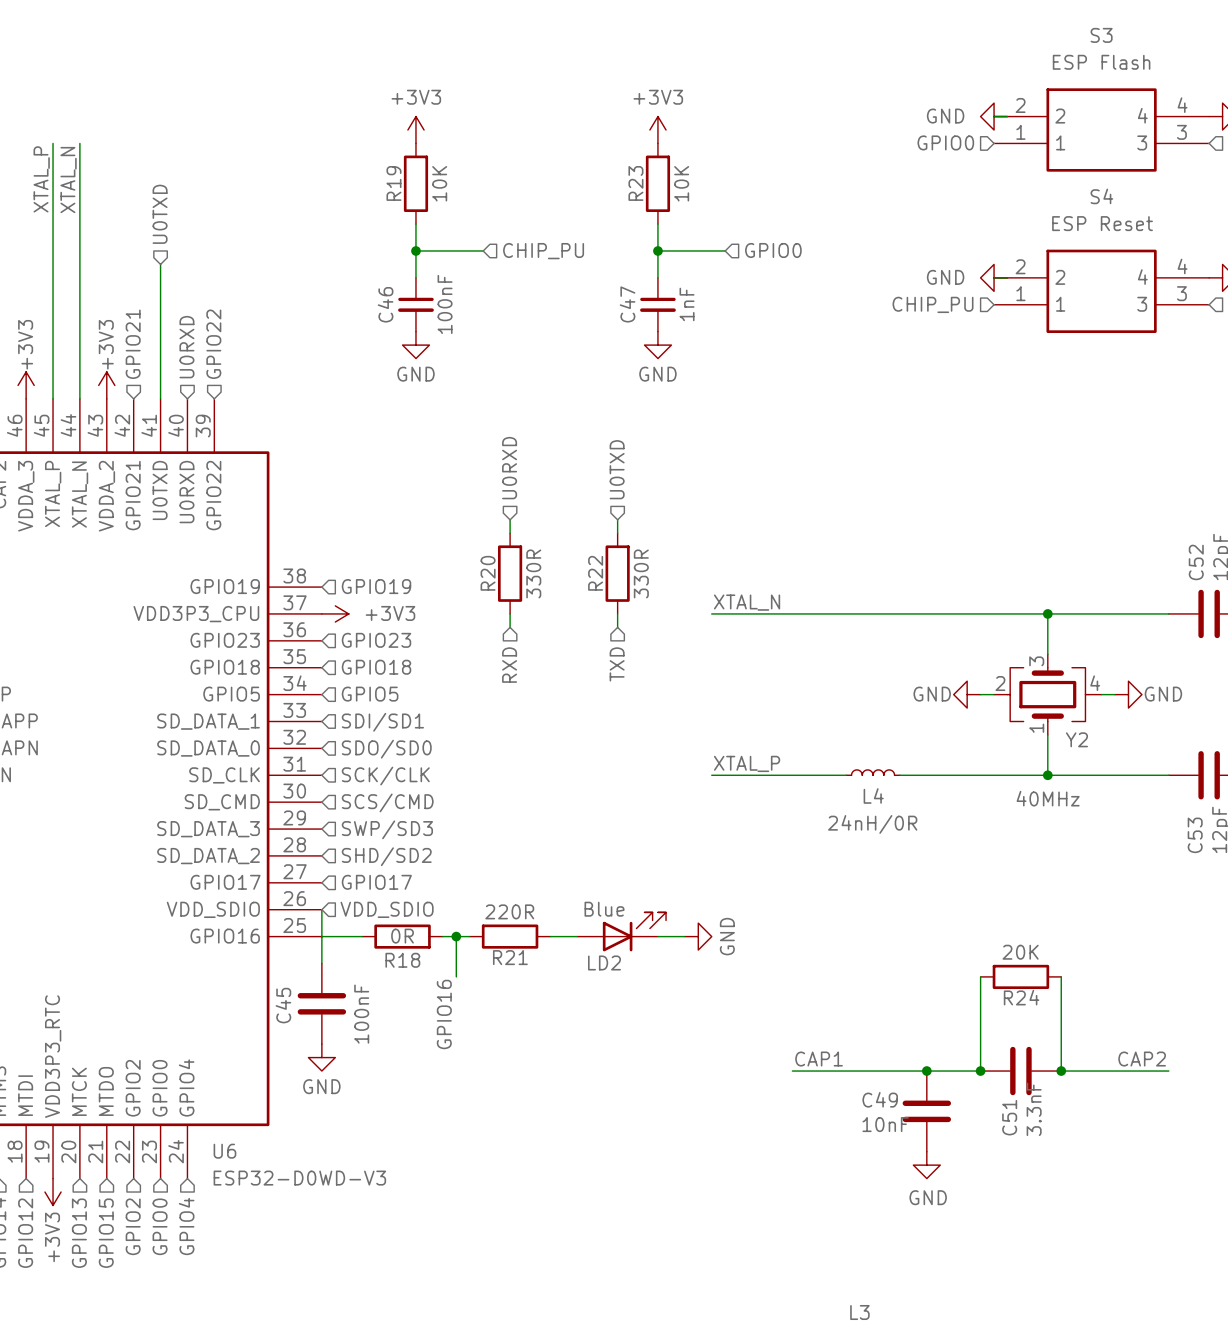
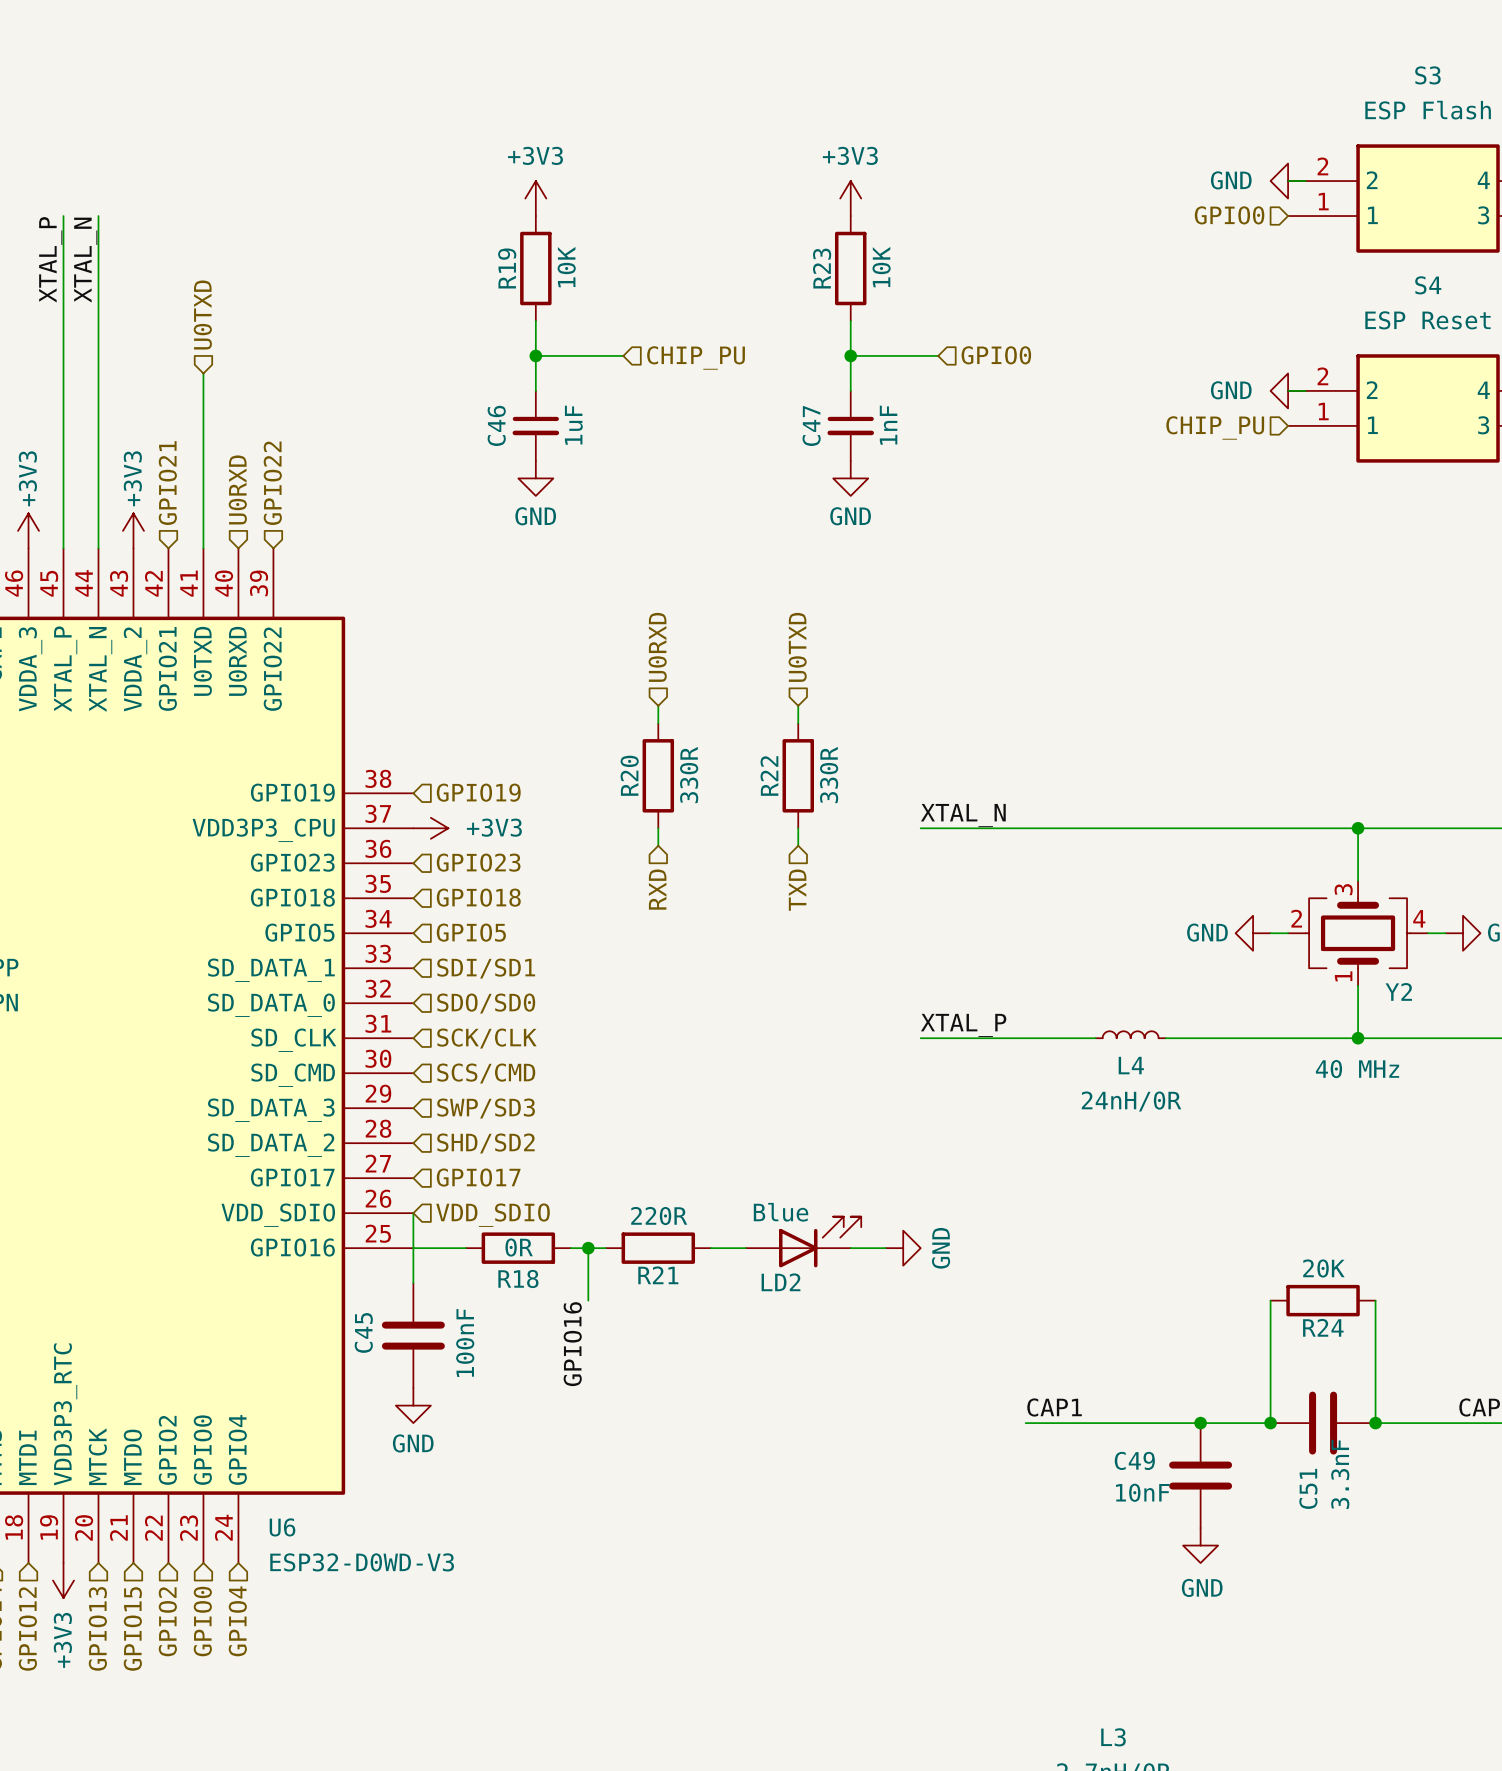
C46 value: 100nF (445, 304) -> 1uF (573, 425)
Y2 value: 40MHz (1048, 798) -> 40 MHz (1357, 1069)

